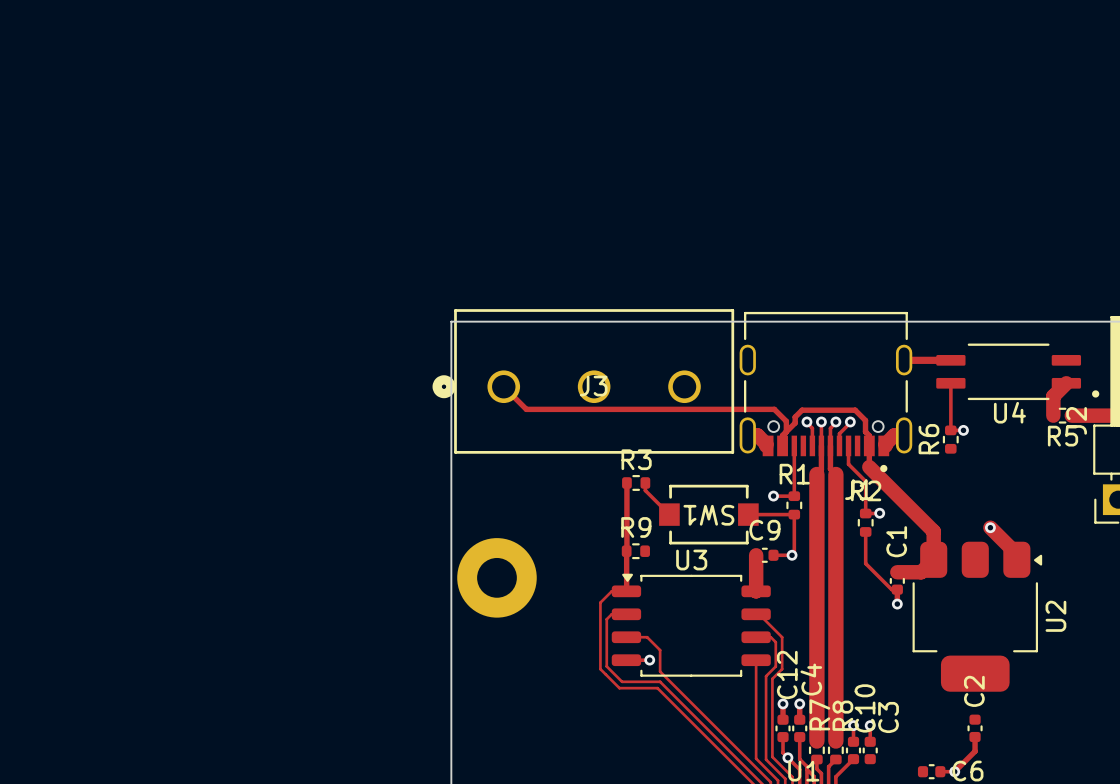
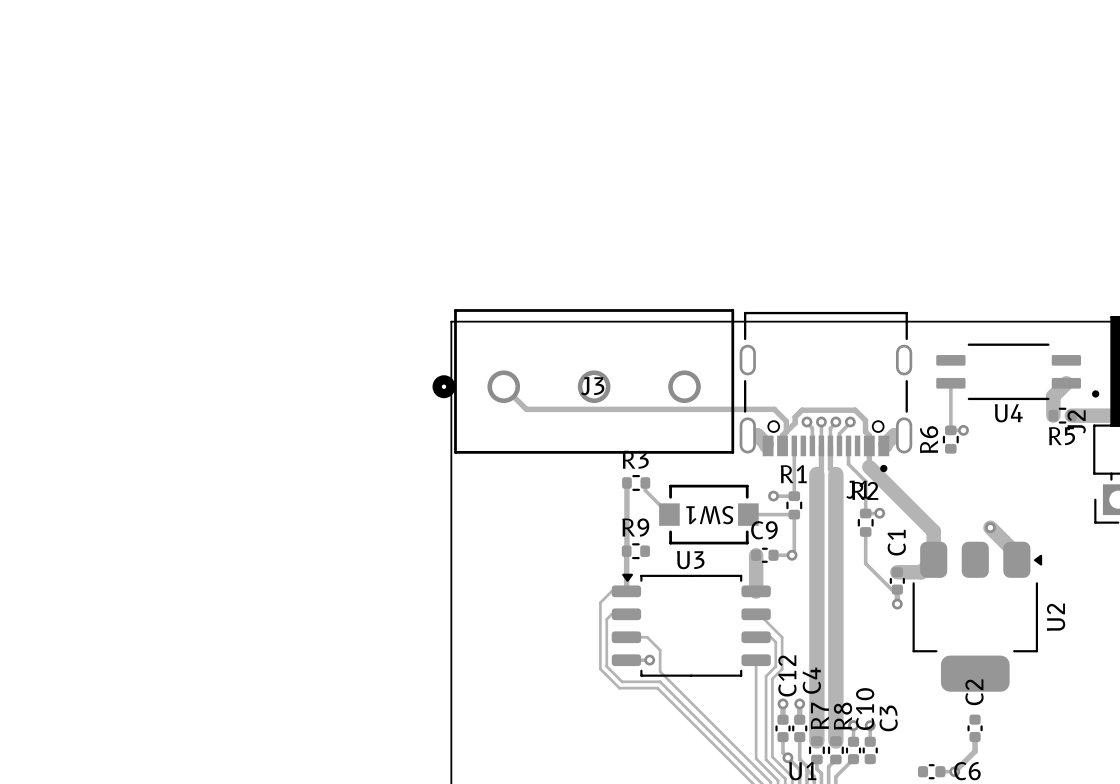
track: (904, 360) (950, 360) -> none
part: (496, 577) -> none

